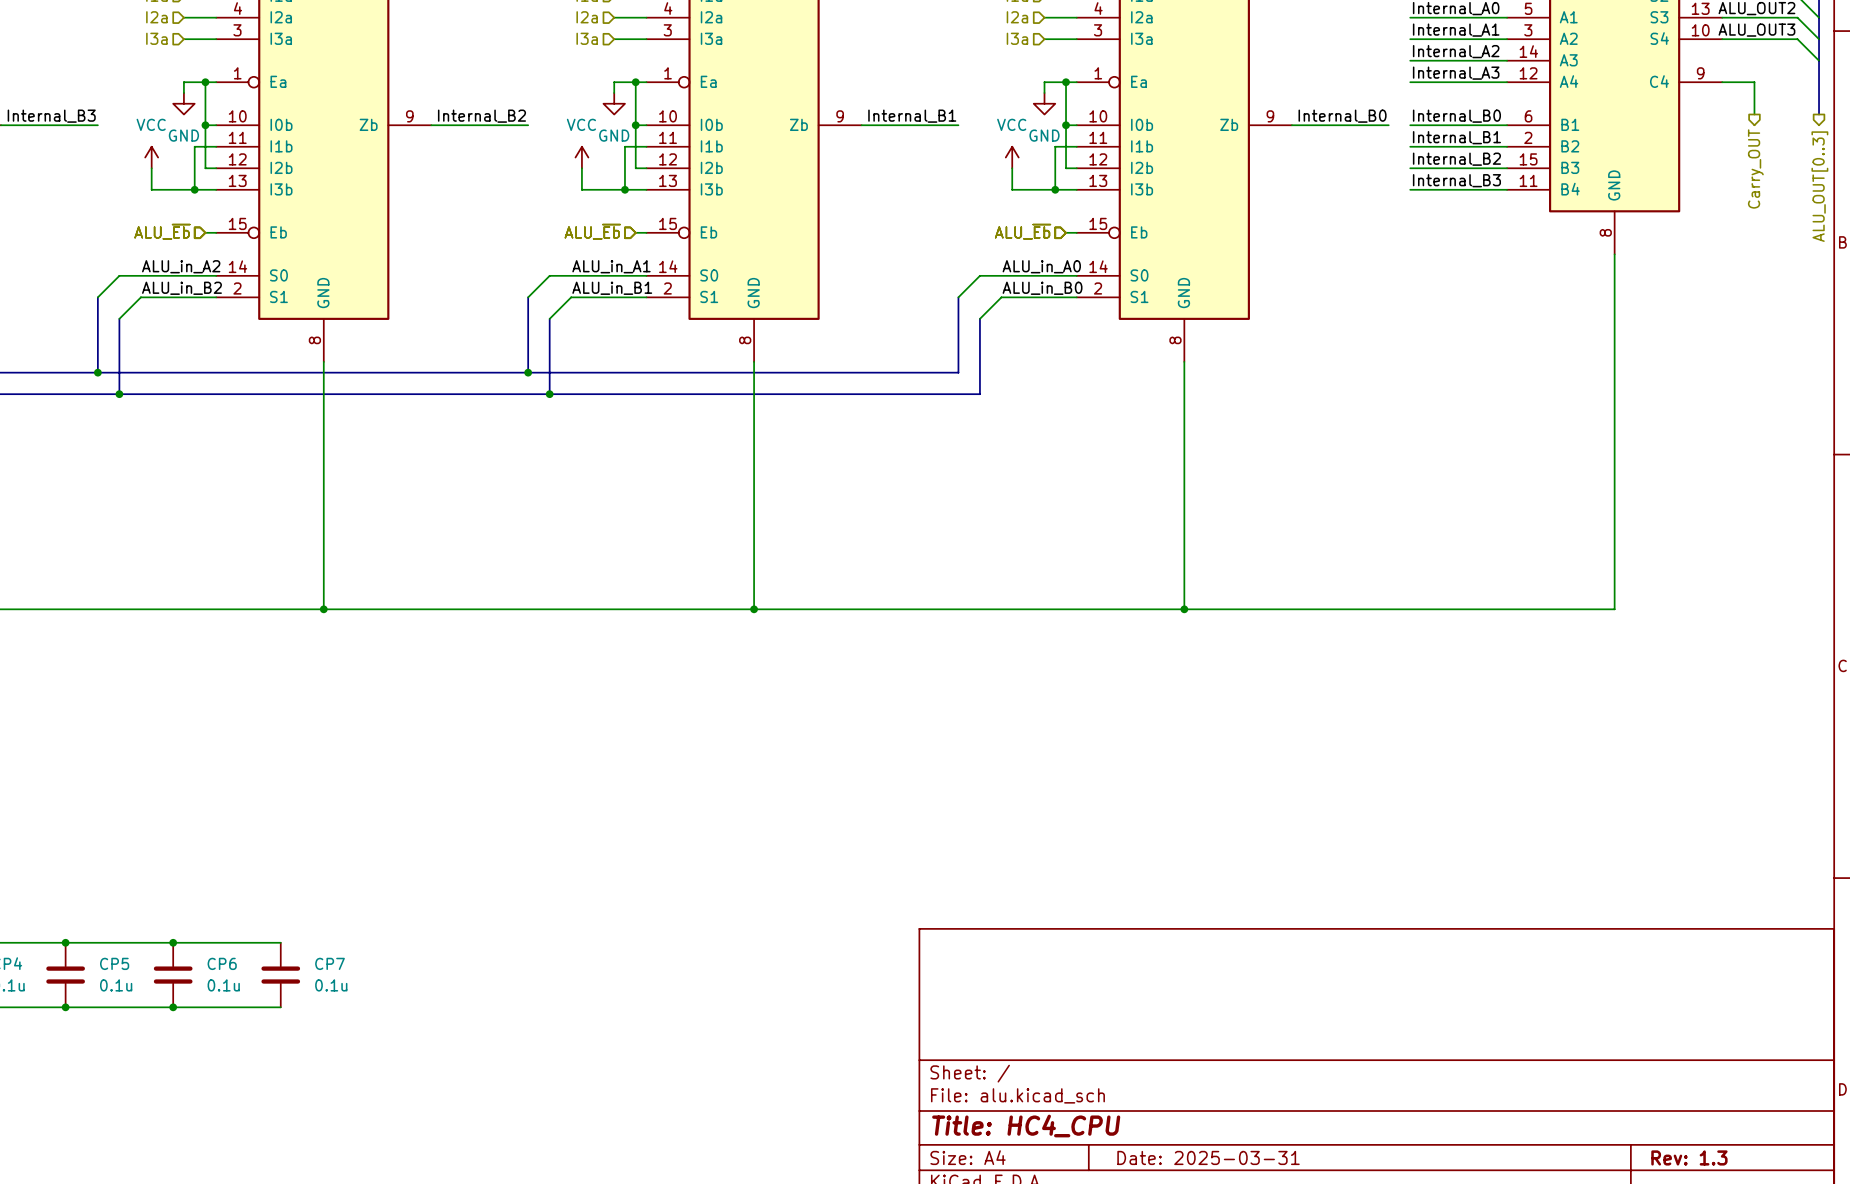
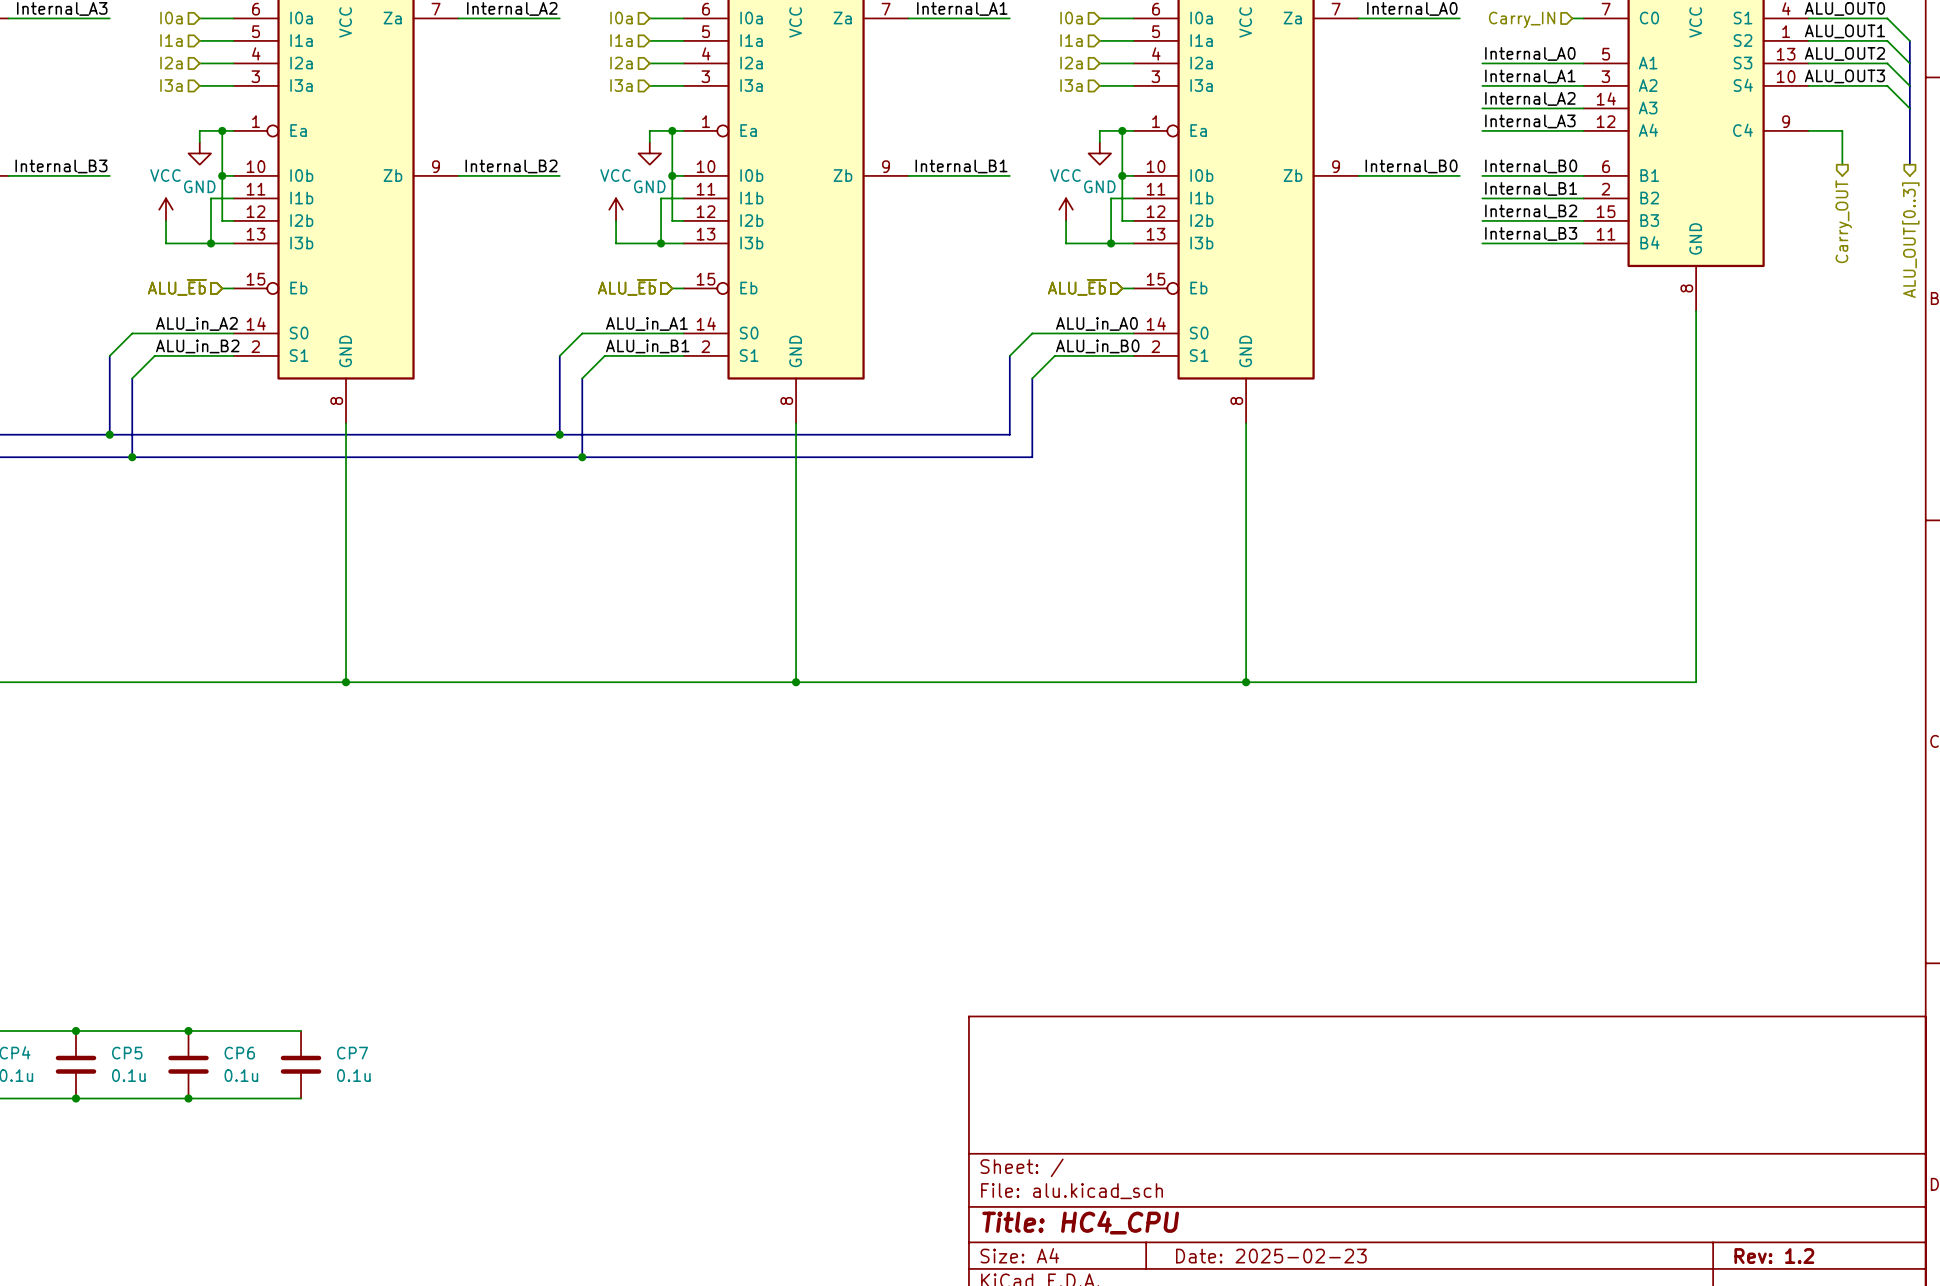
title block: Date: 2025-03-31 (1208, 1157) -> Date: 2025-02-23 (1271, 1256)
title block: Rev: 1.3 (1689, 1157) -> Rev: 1.2 (1774, 1256)

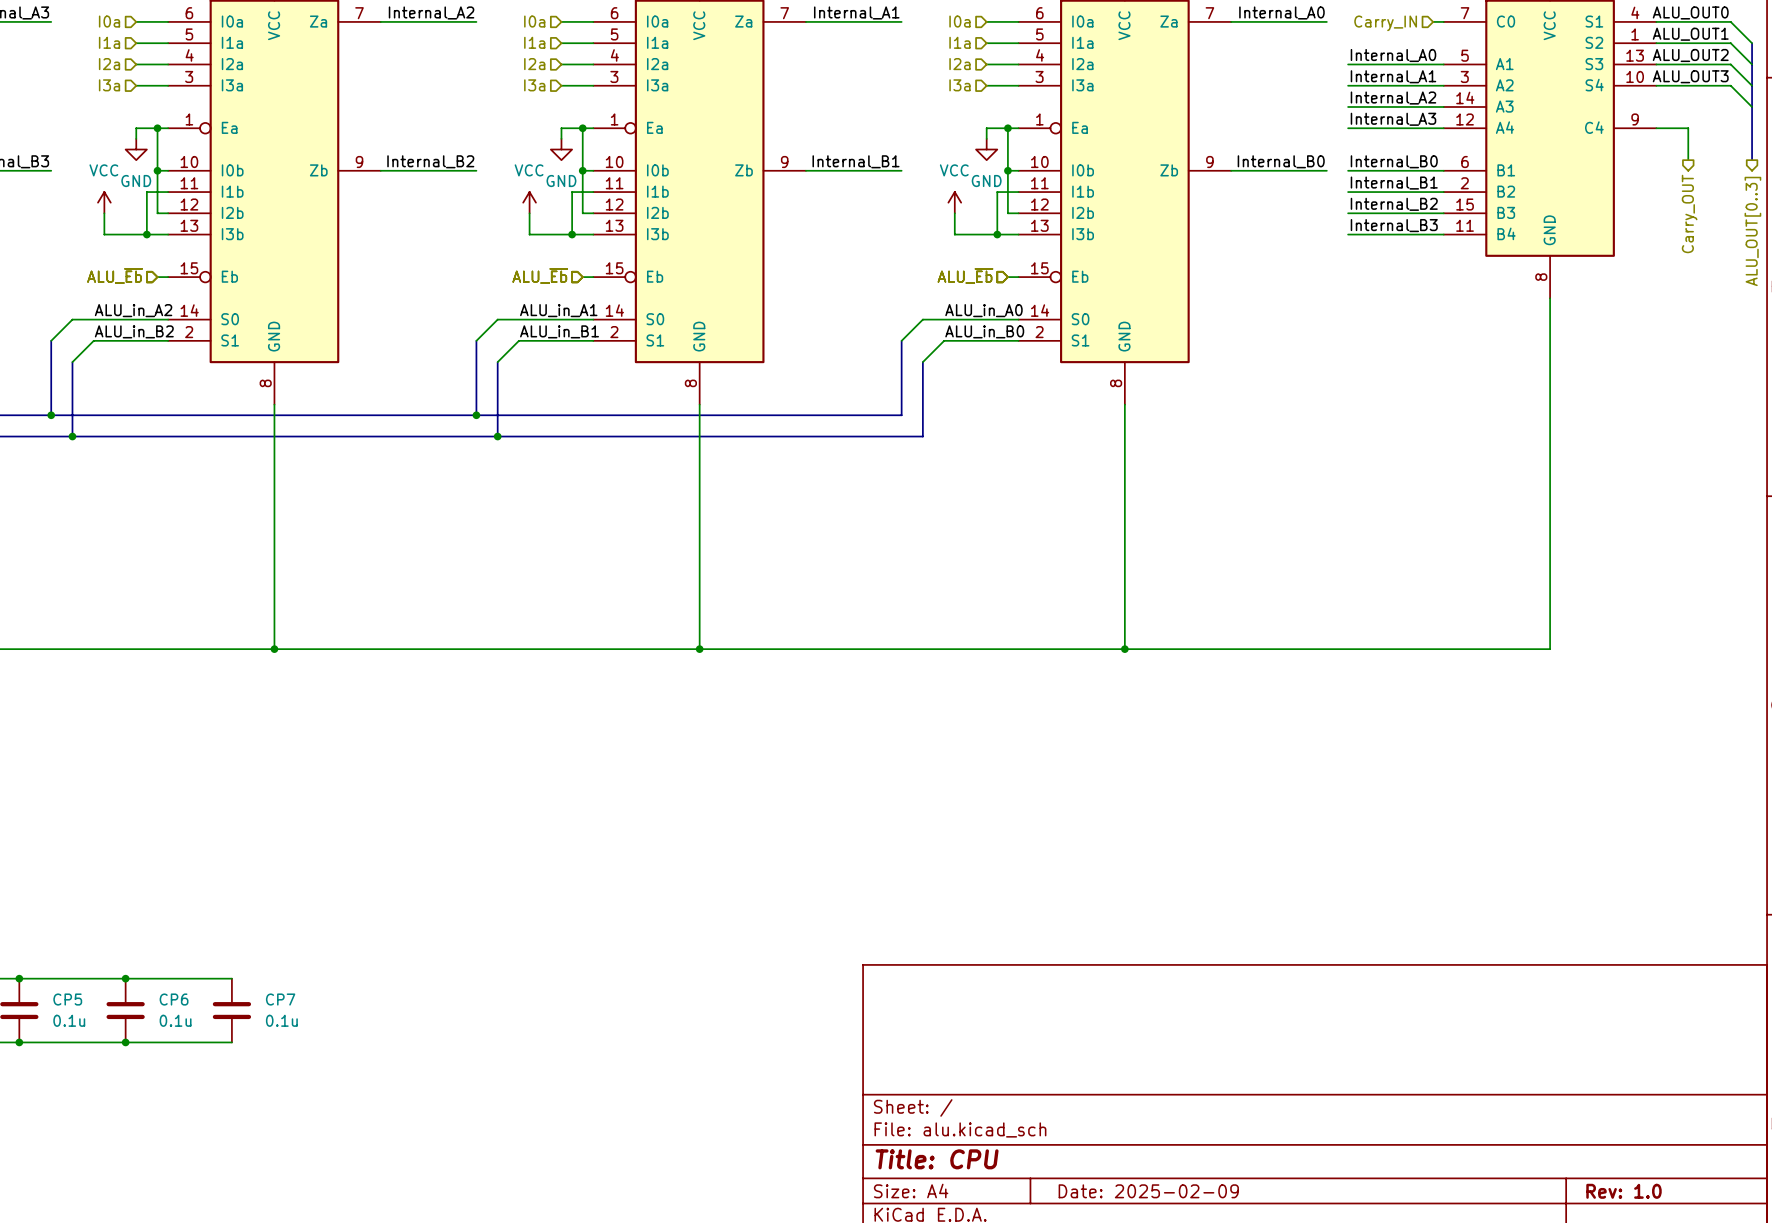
title block: Title: HC4_CPU (1080, 1222) -> Title: CPU (937, 1159)
title block: Date: 2025-02-23 (1271, 1256) -> Date: 2025-02-09 (1148, 1191)
title block: Rev: 1.2 (1774, 1256) -> Rev: 1.0 (1624, 1191)

